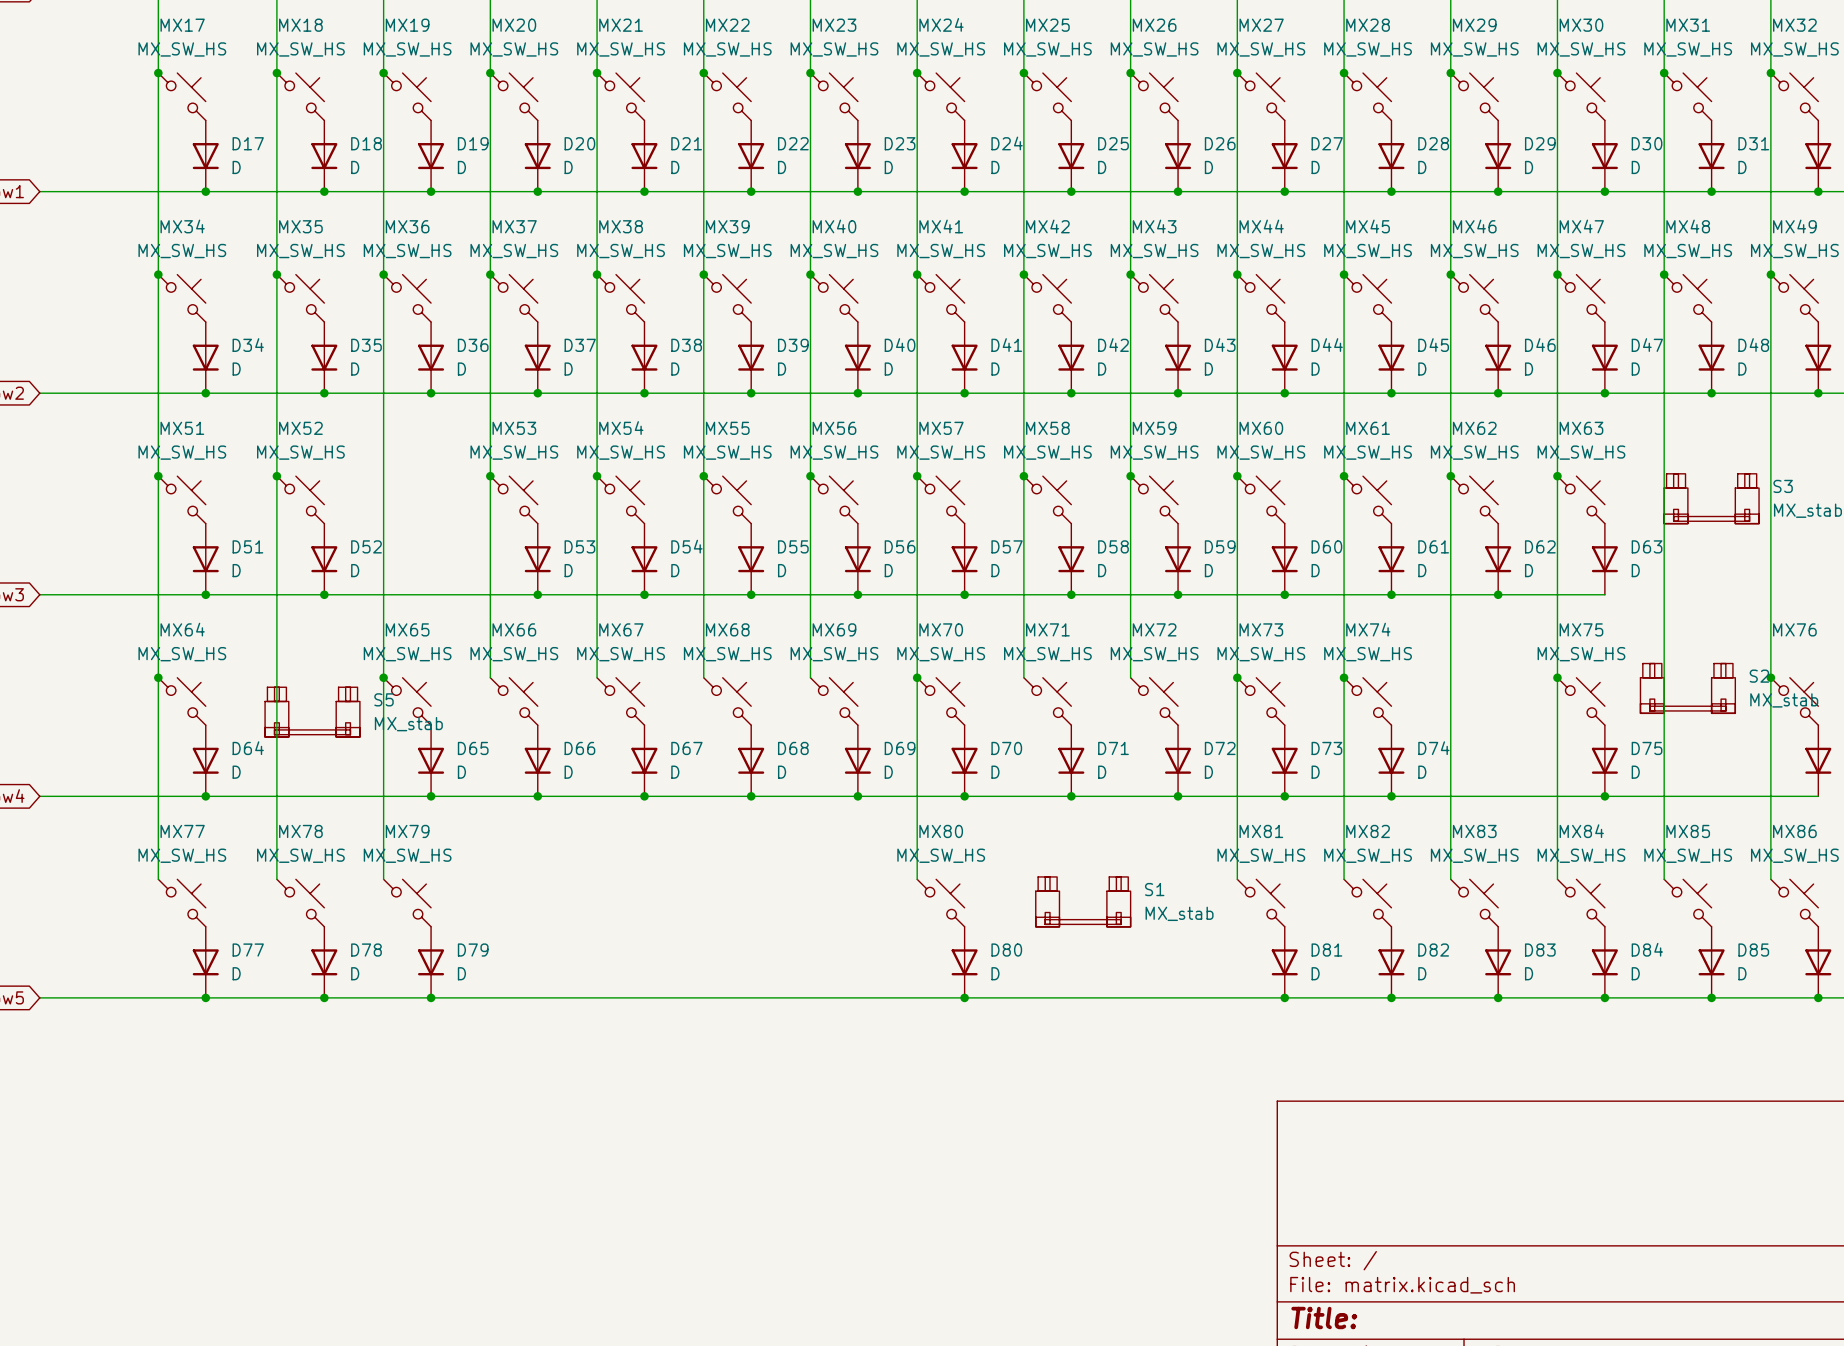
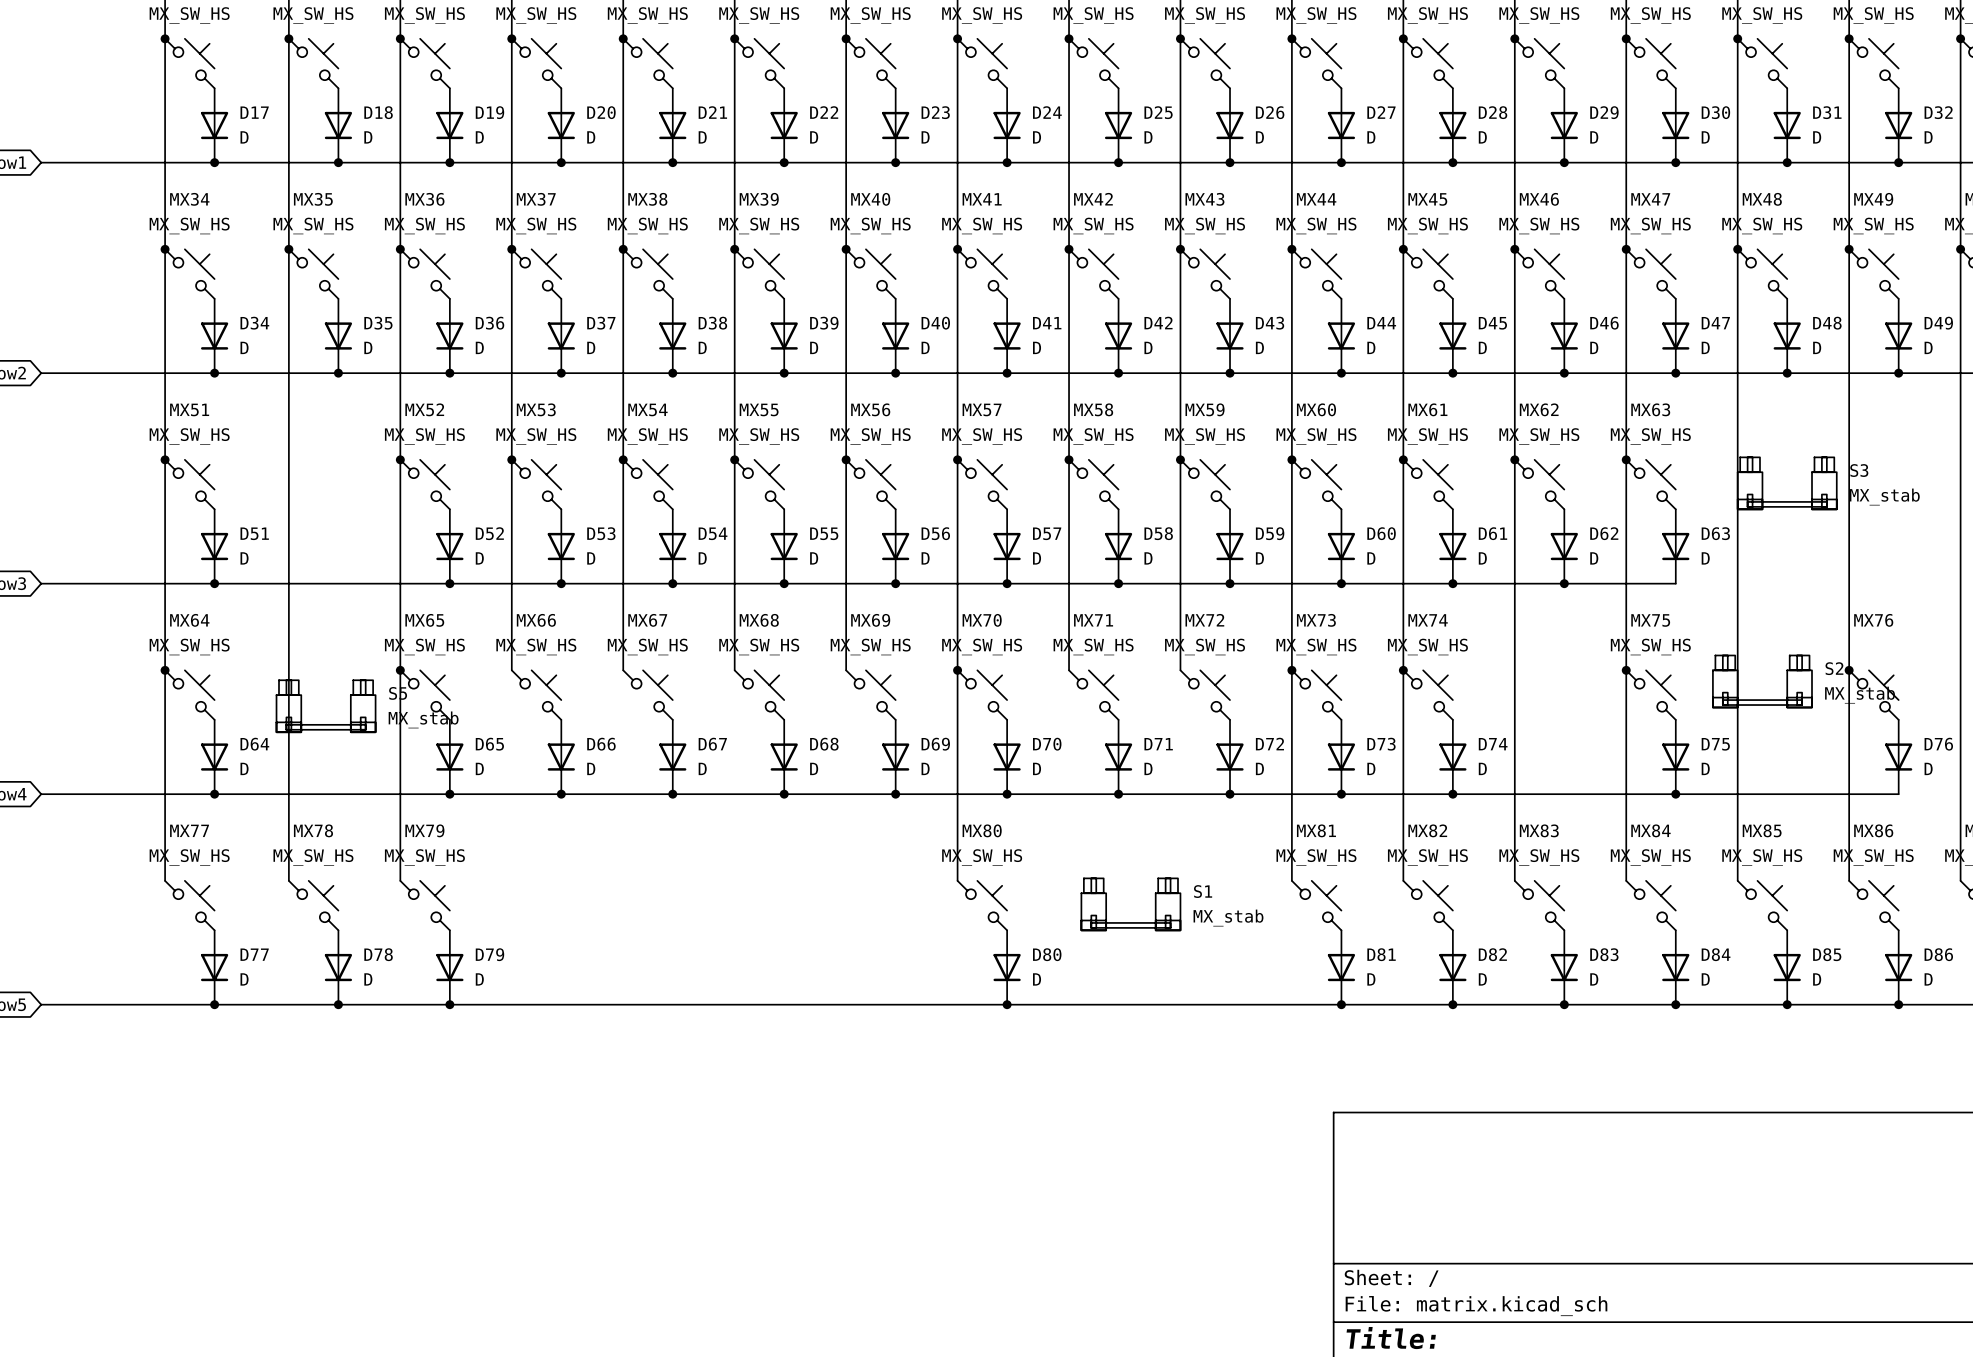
junction: (276, 476) -> none
junction: none -> (400, 459)
MX52 position: (300, 499) -> (425, 484)
D52 position: (324, 559) -> (449, 546)
junction: (324, 594) -> none
junction: none -> (449, 583)

